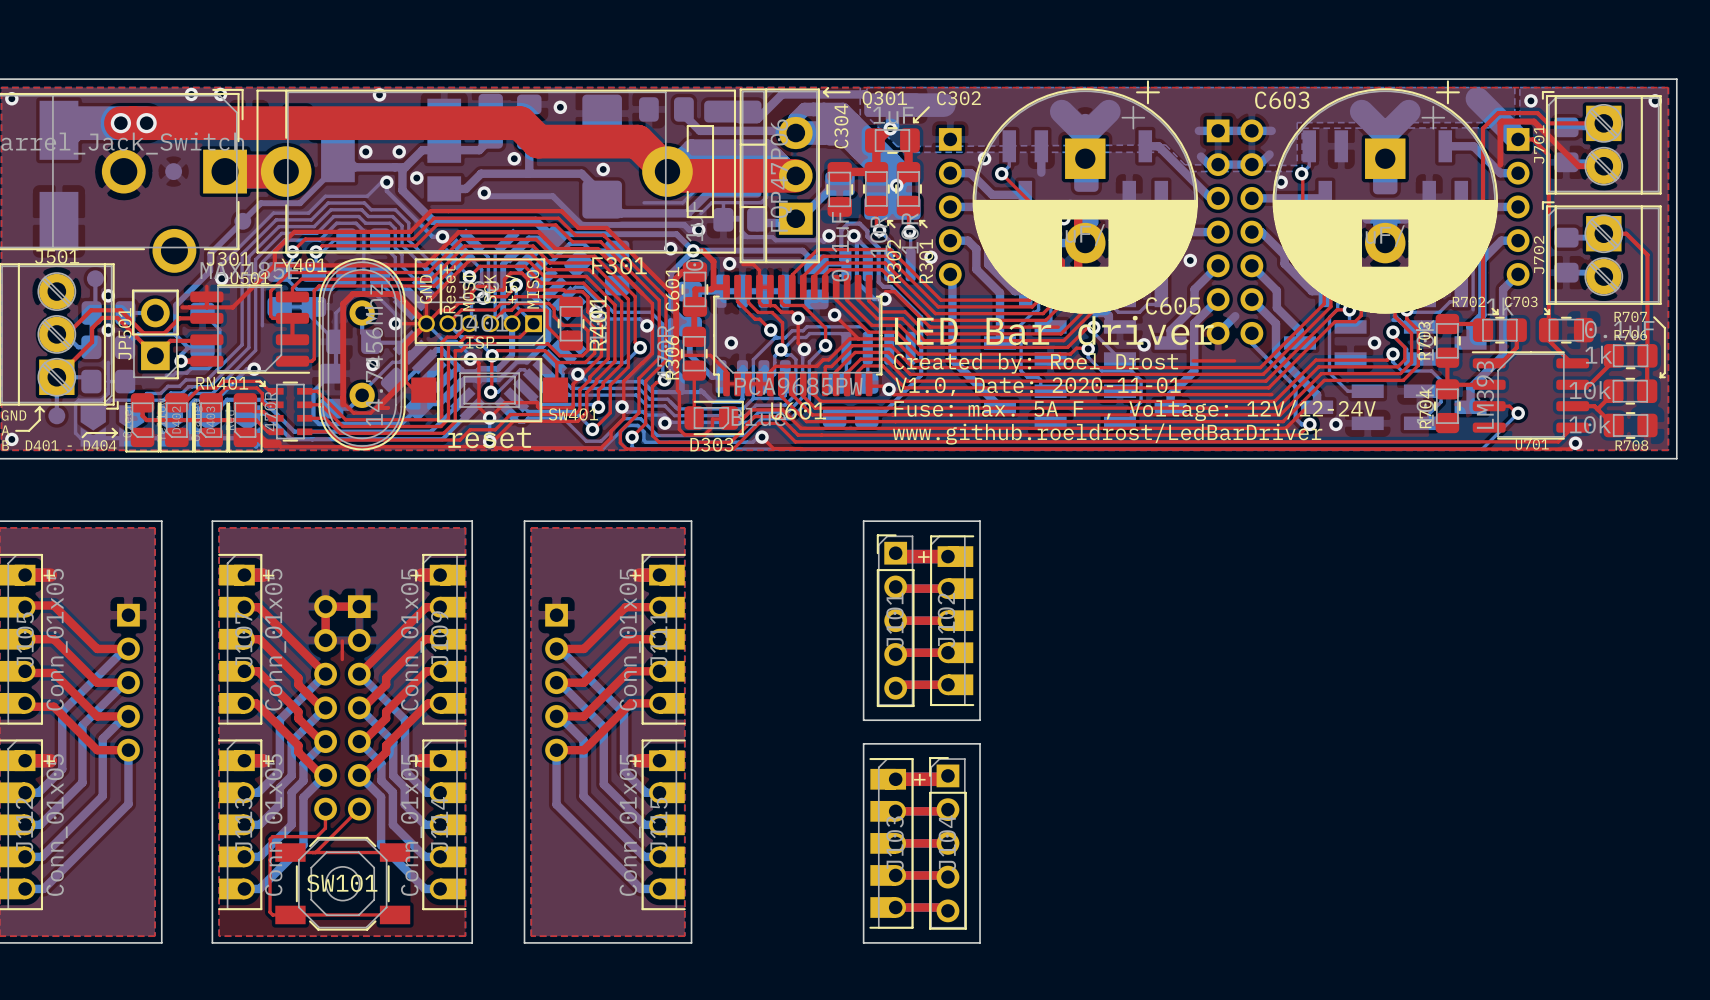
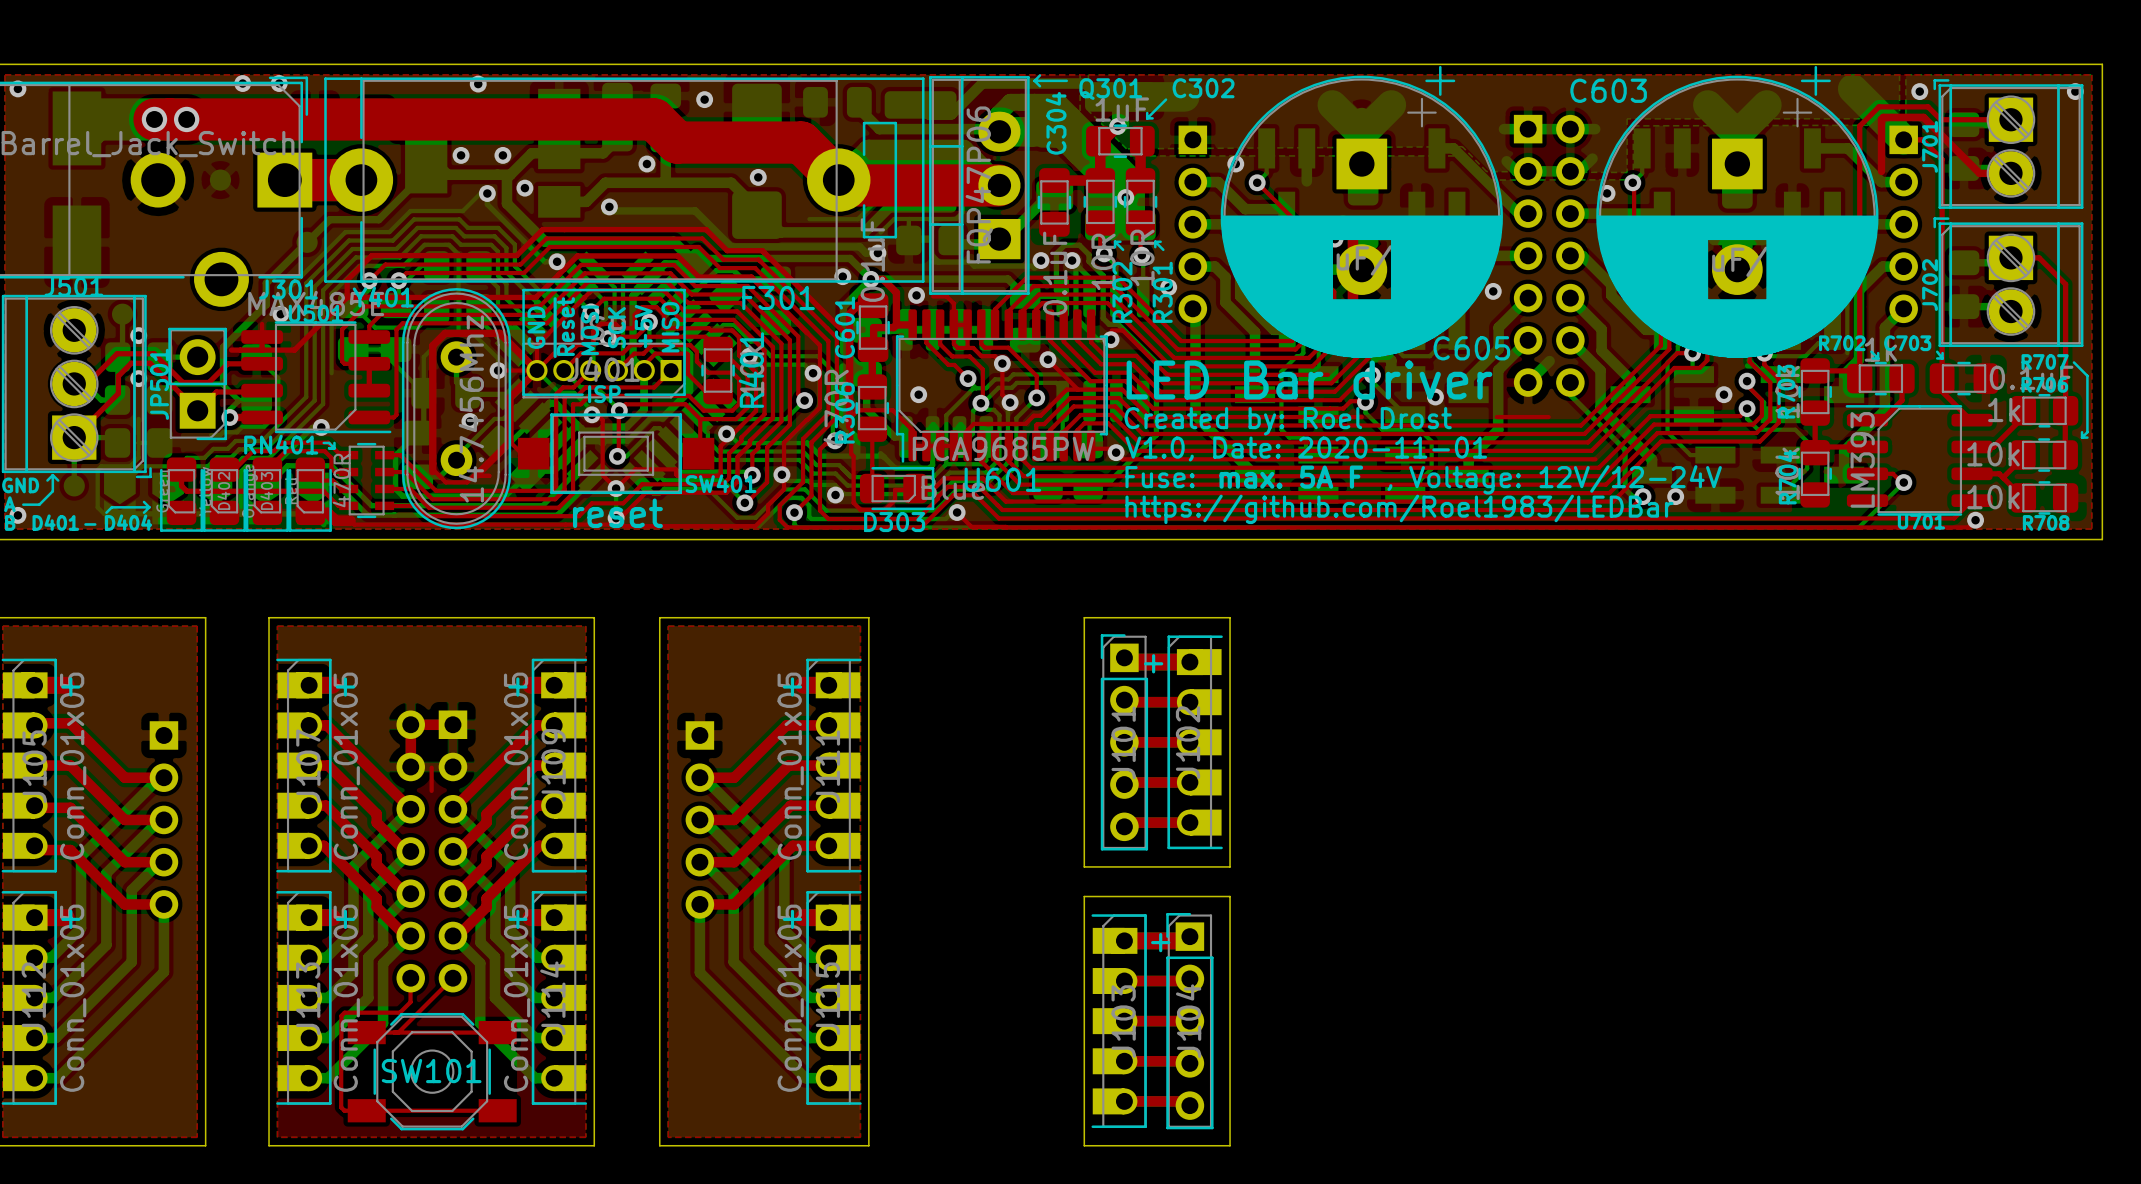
text: www.github.roeldrost/LedBarDriver (1107, 434) -> https://github.com/Roel1983/LEDBar (1399, 509)

